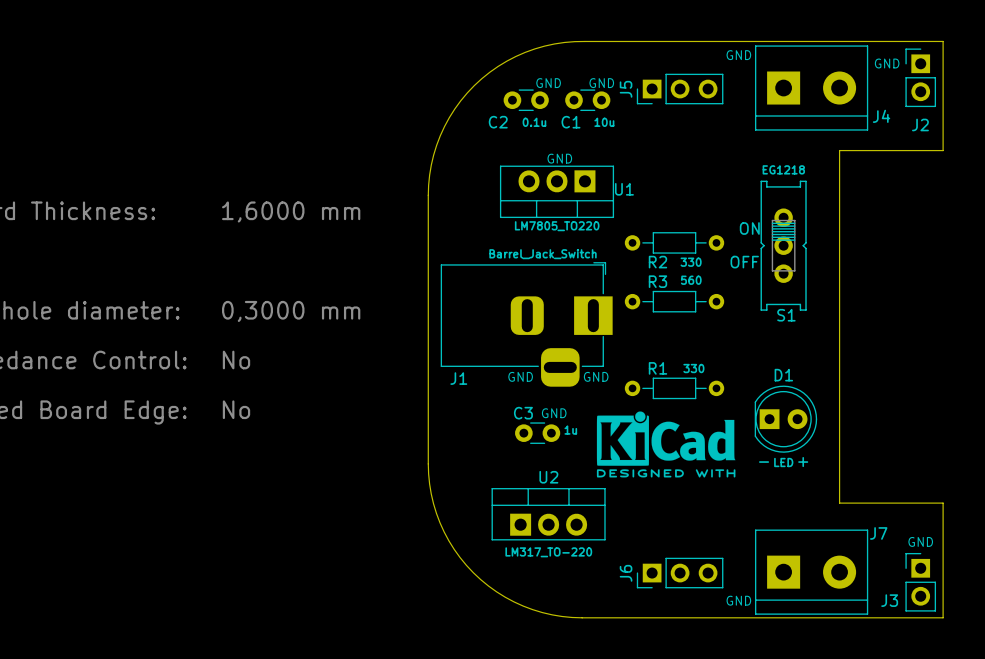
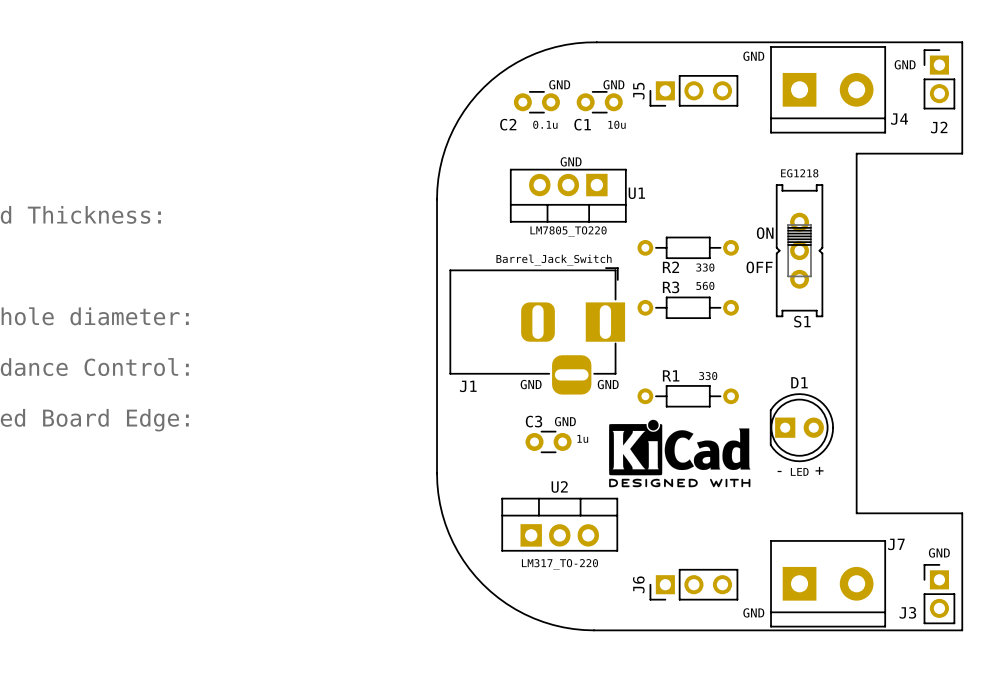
text: 1,6000 mm (291, 211) -> none
text: 0,3000 mm (291, 311) -> none
text: No (236, 360) -> none
text: No (236, 409) -> none

